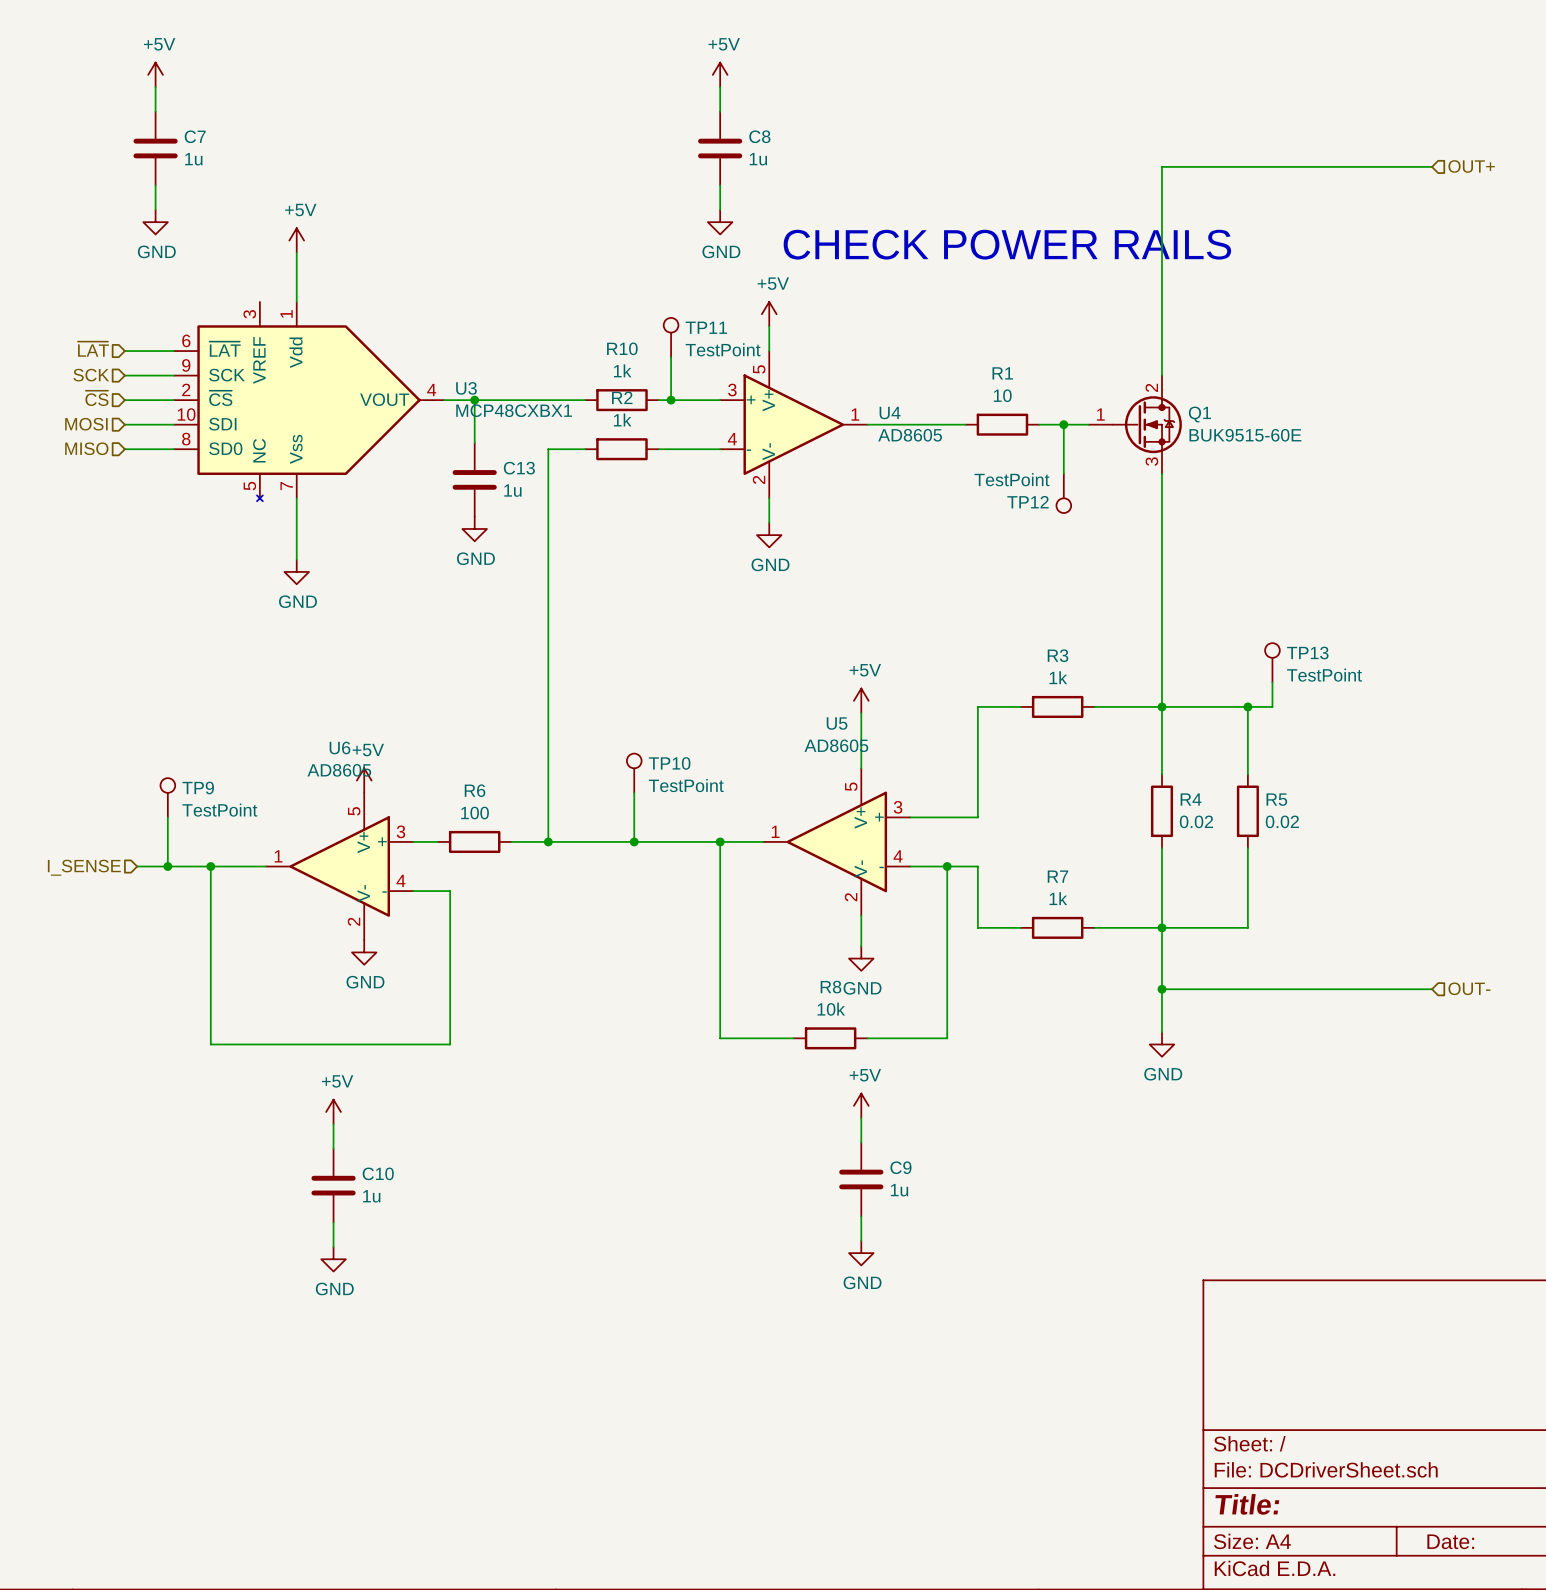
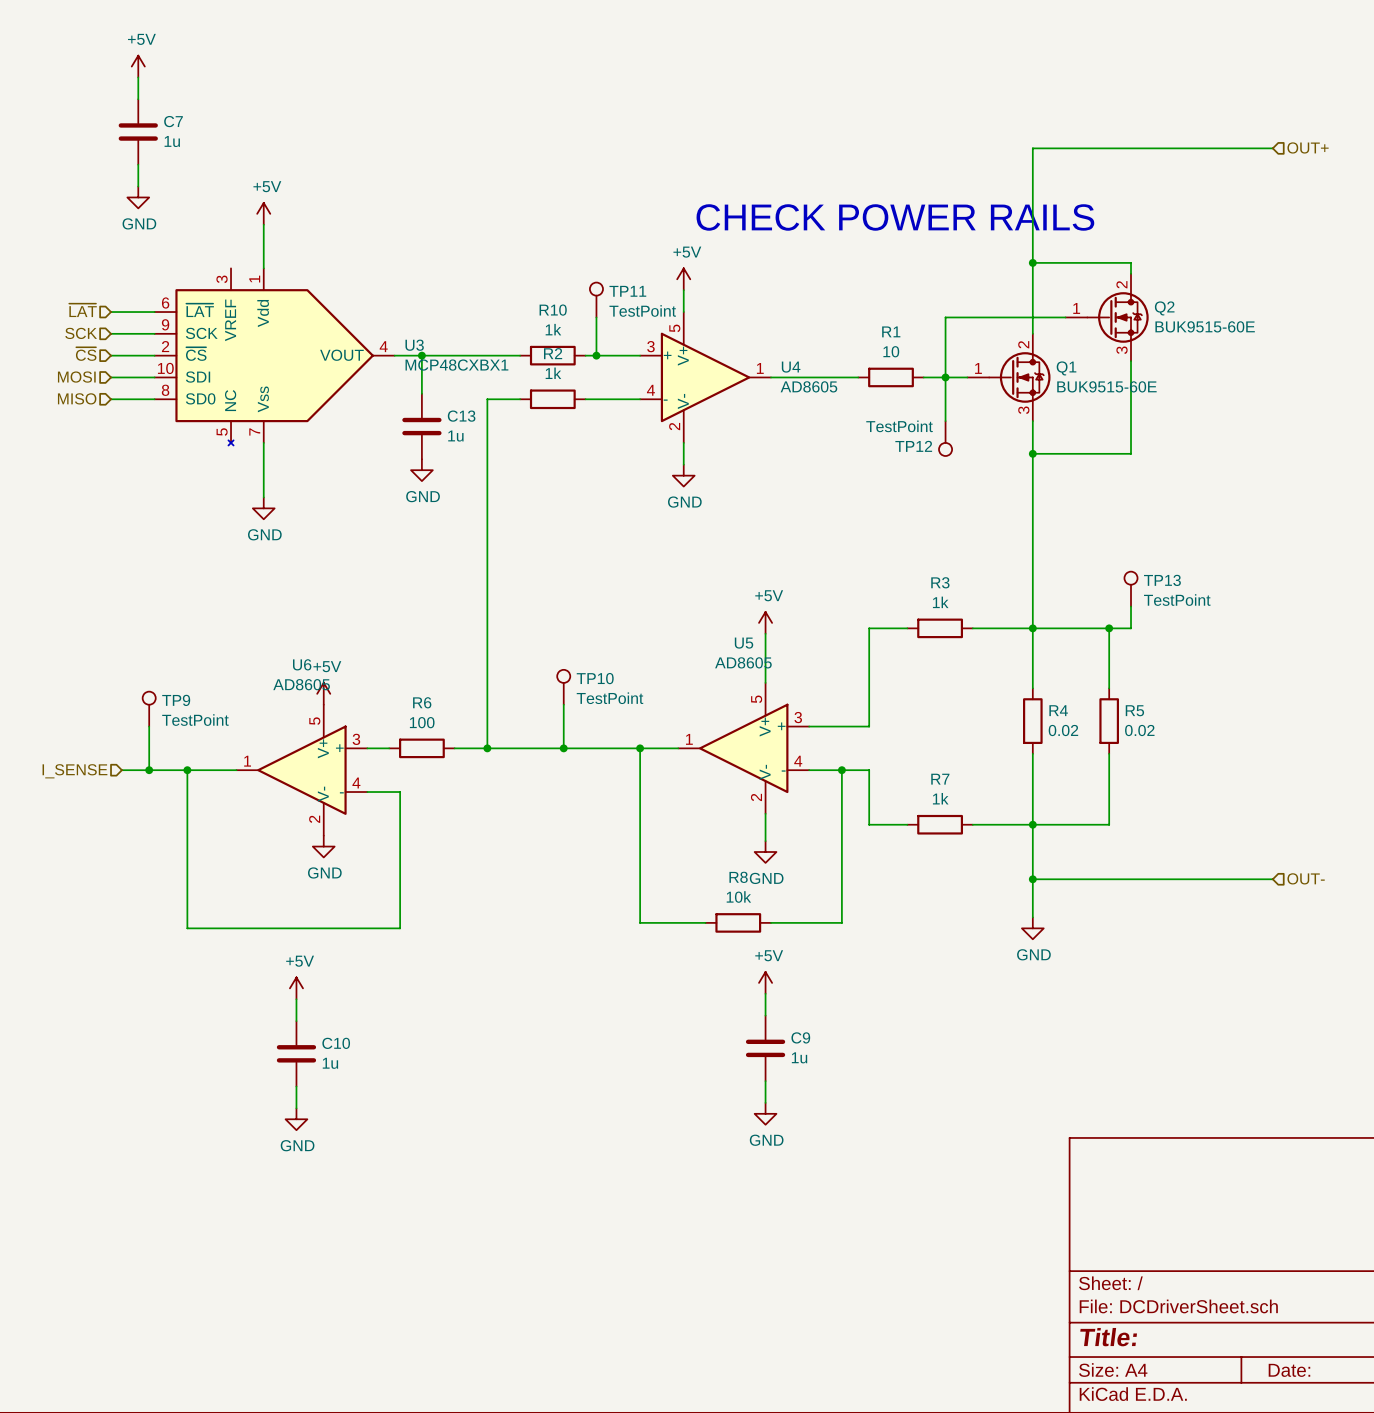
power symbol: +5V (720, 74) -> none
wire: (720, 87) (720, 111) -> none
C8: 1u (720, 148) -> none
wire: (720, 185) (720, 209) -> none
power symbol: GND (720, 222) -> none
wire: none -> (1032, 262) (1131, 262) (1131, 273)
junction: none -> (1032, 262)
wire: none -> (1065, 317) (945, 317) (945, 377)
Q2: none -> BUK9515-60E (1107, 317)
wire: none -> (1131, 361) (1131, 453) (1032, 453)
junction: none -> (1032, 453)

